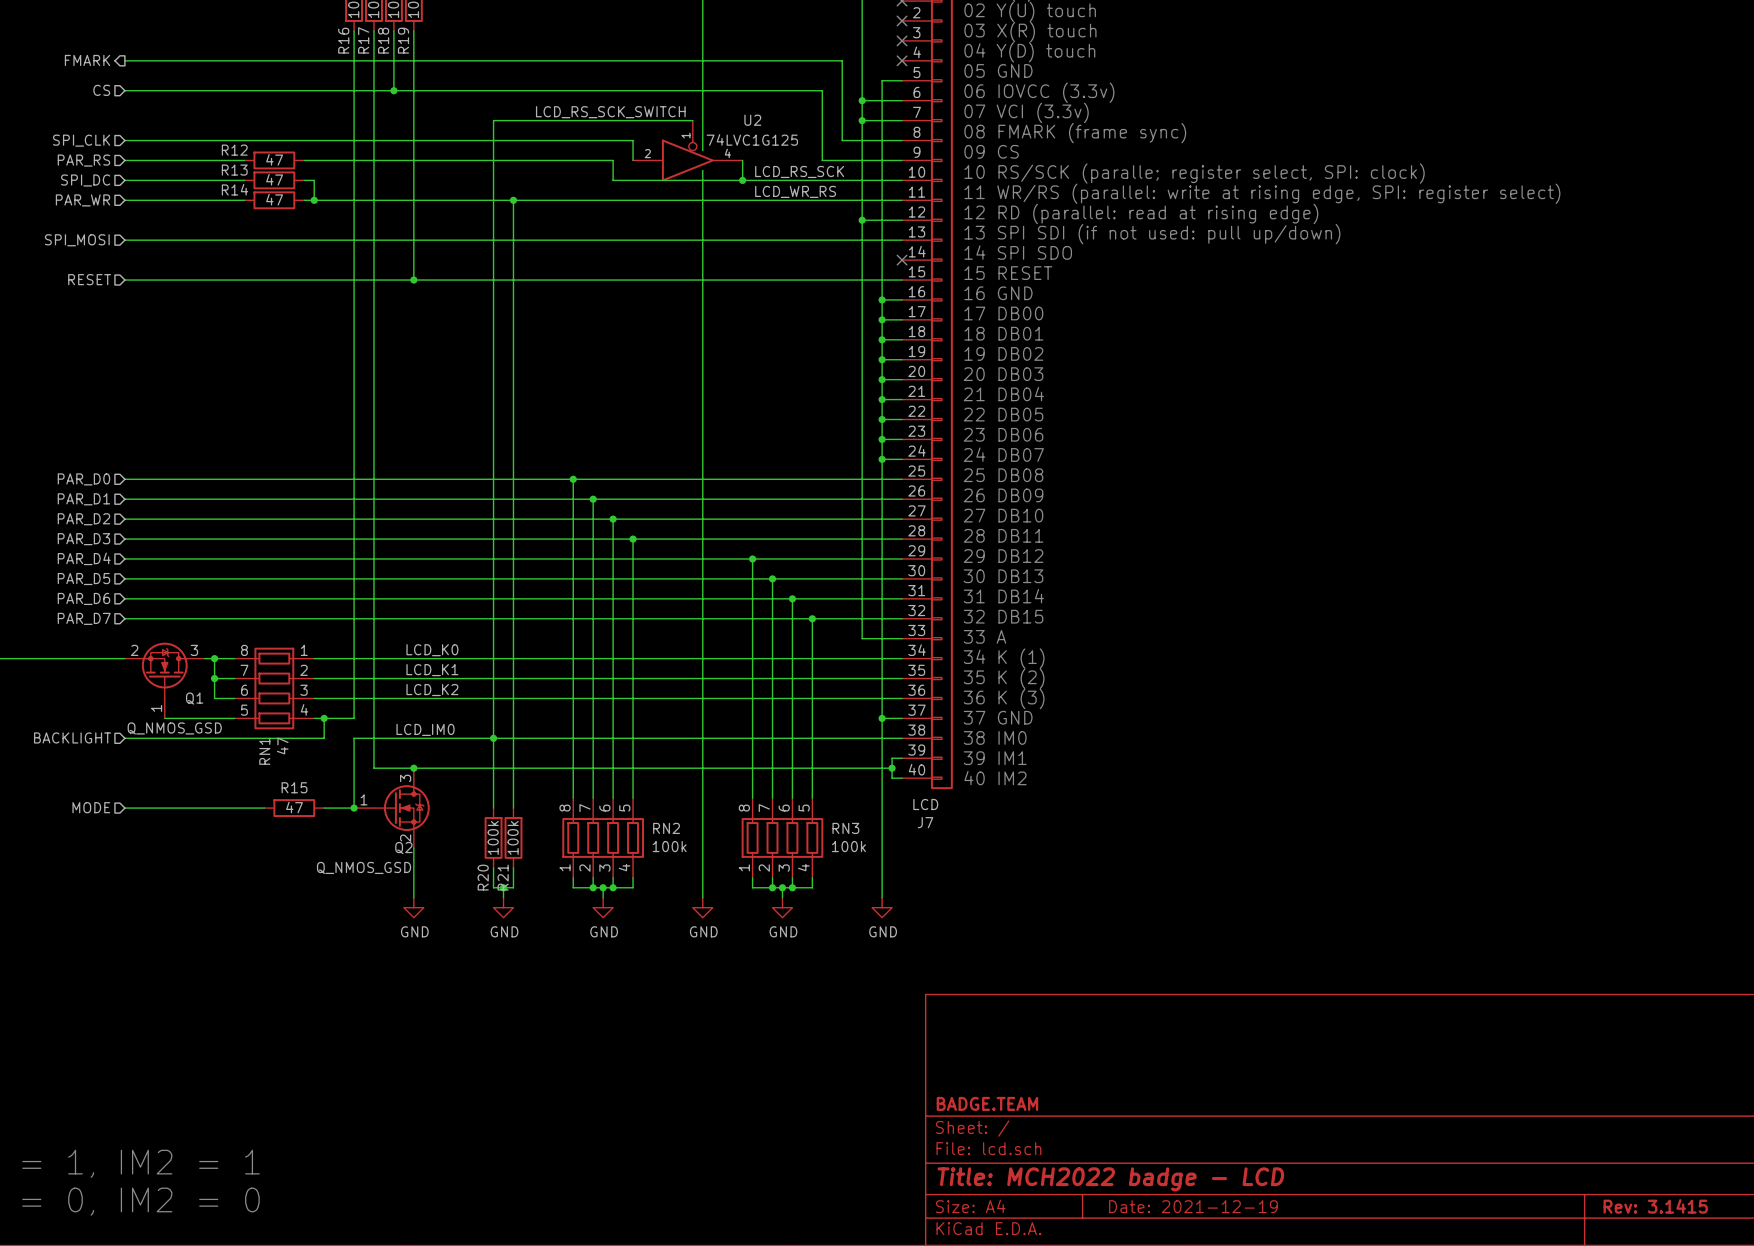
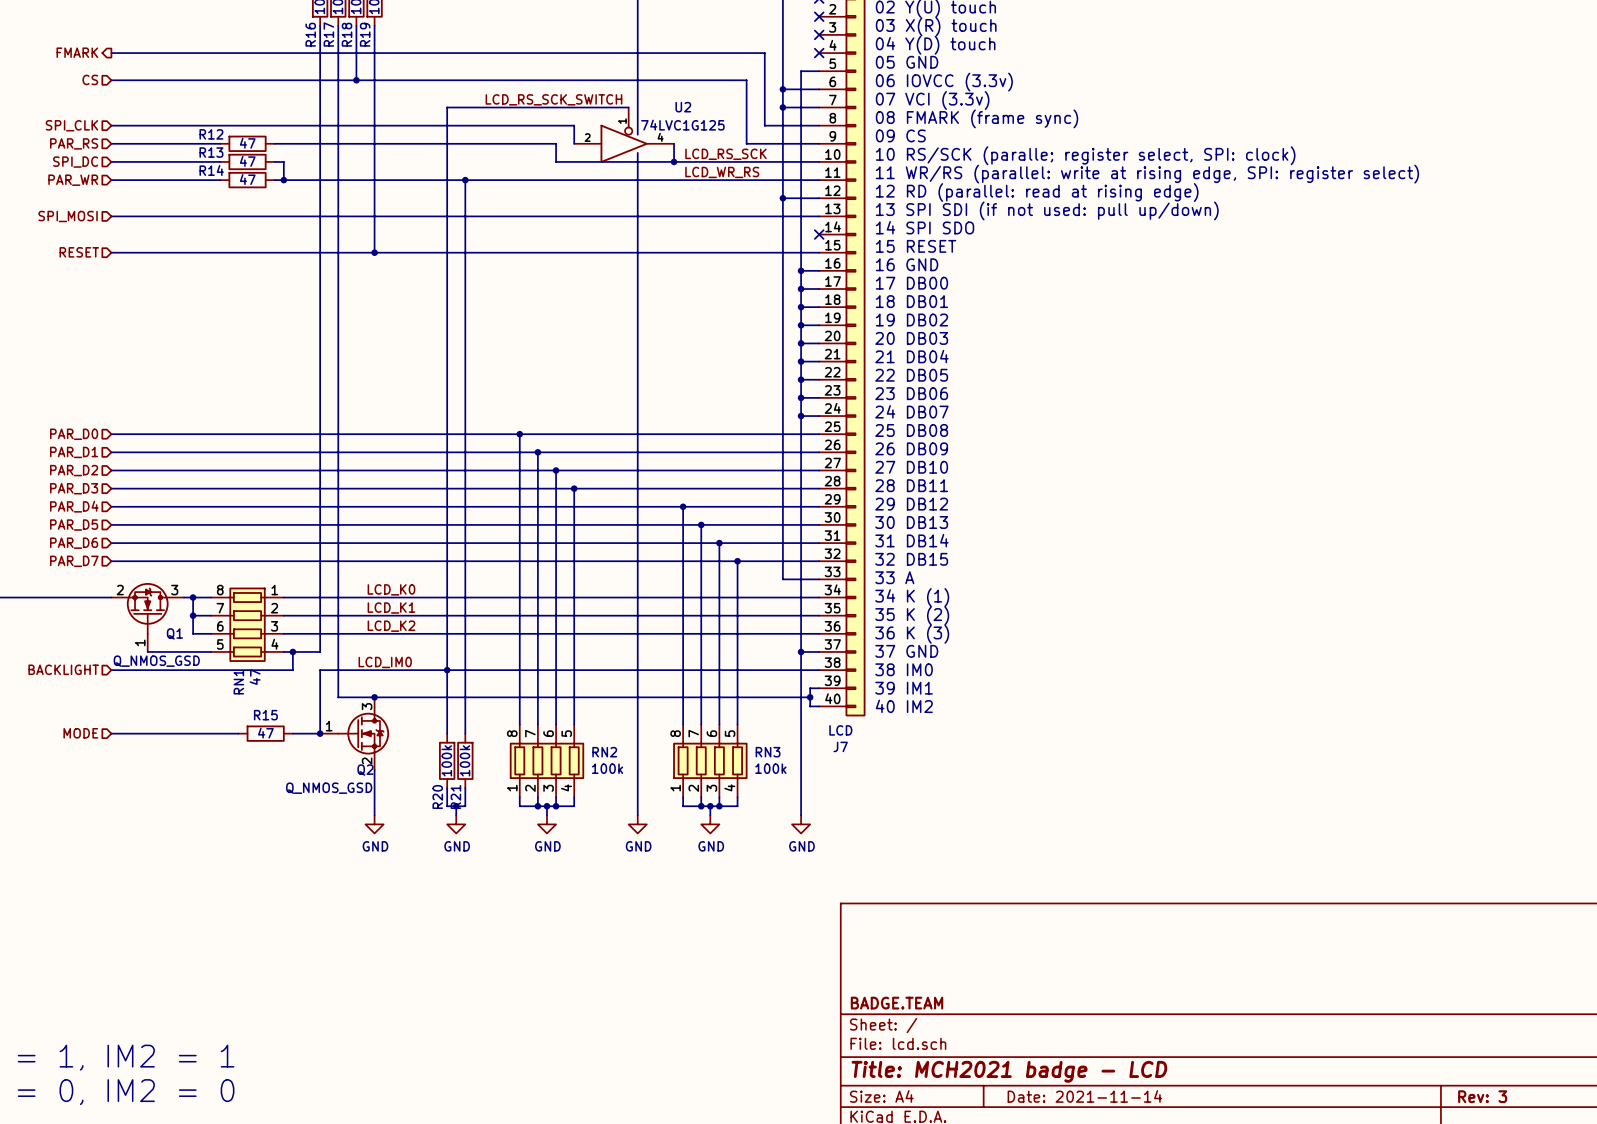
title block: Title: MCH2022 badge - LCD (1110, 1179) -> Title: MCH2021 badge - LCD (1009, 1071)
title block: Date: 2021-12-19 (1193, 1206) -> Date: 2021-11-14 (1084, 1096)
title block: Rev: 3.1415 (1655, 1206) -> Rev: 3 (1482, 1096)

